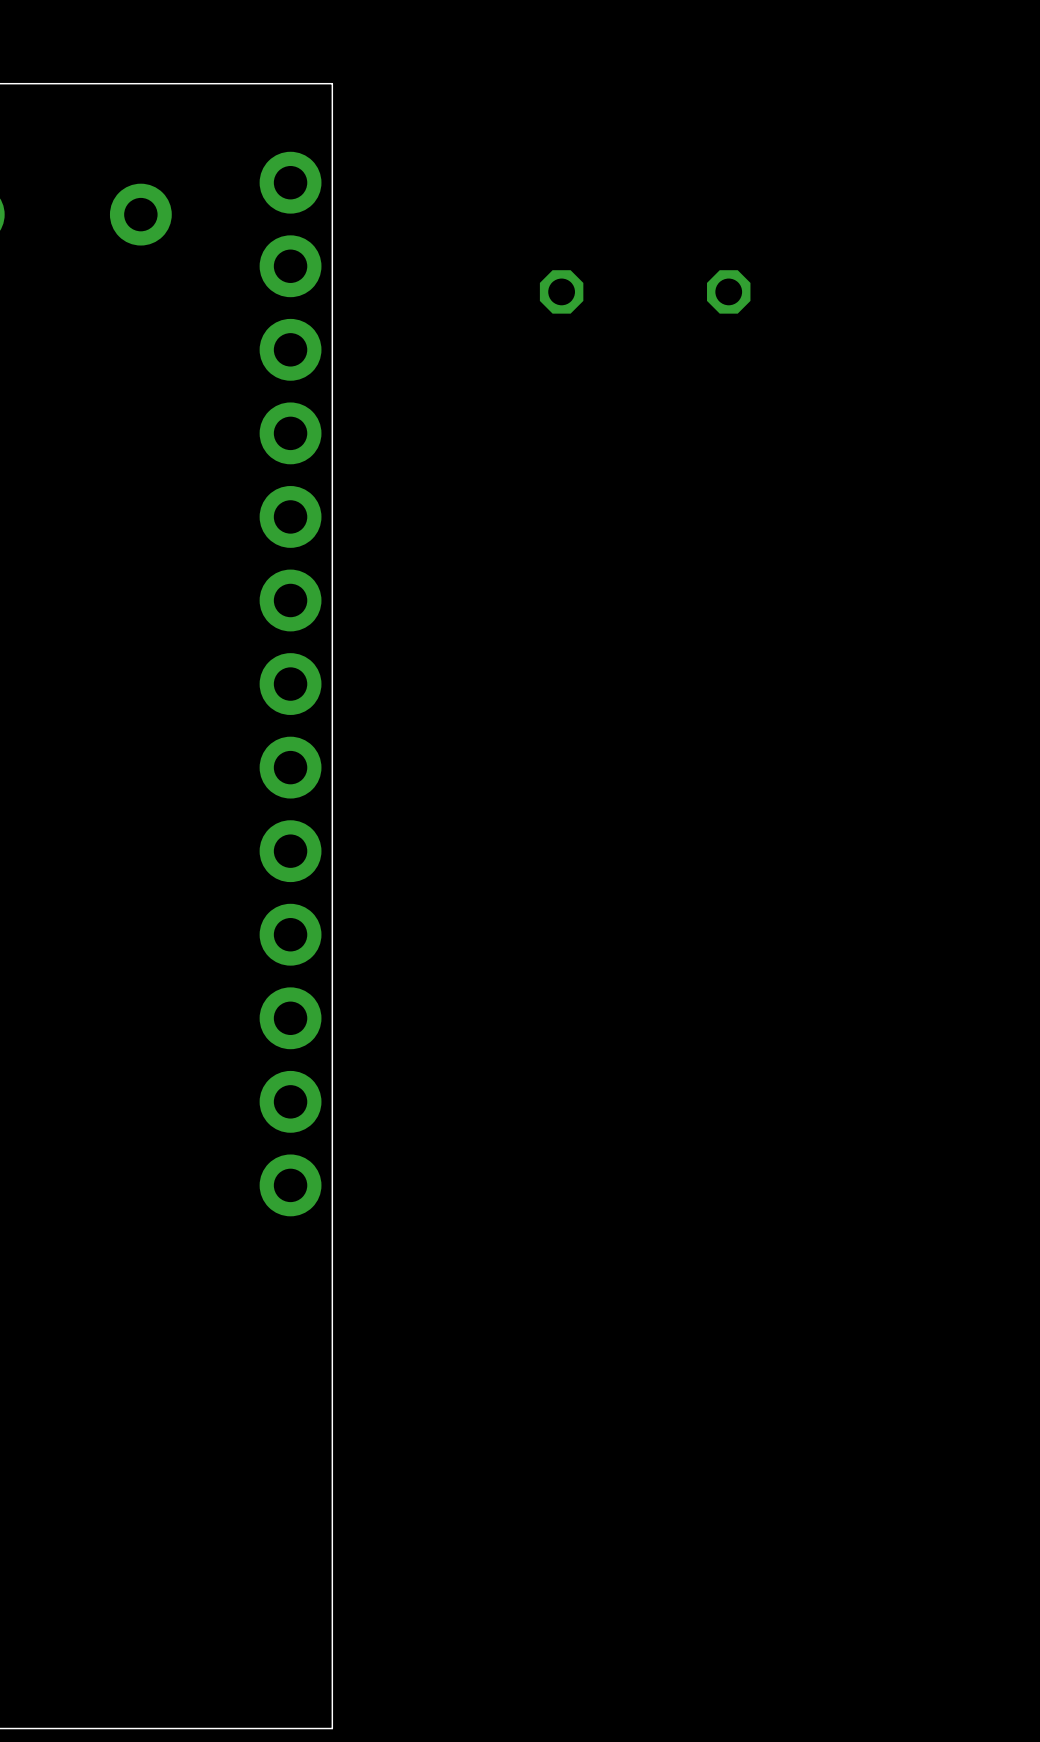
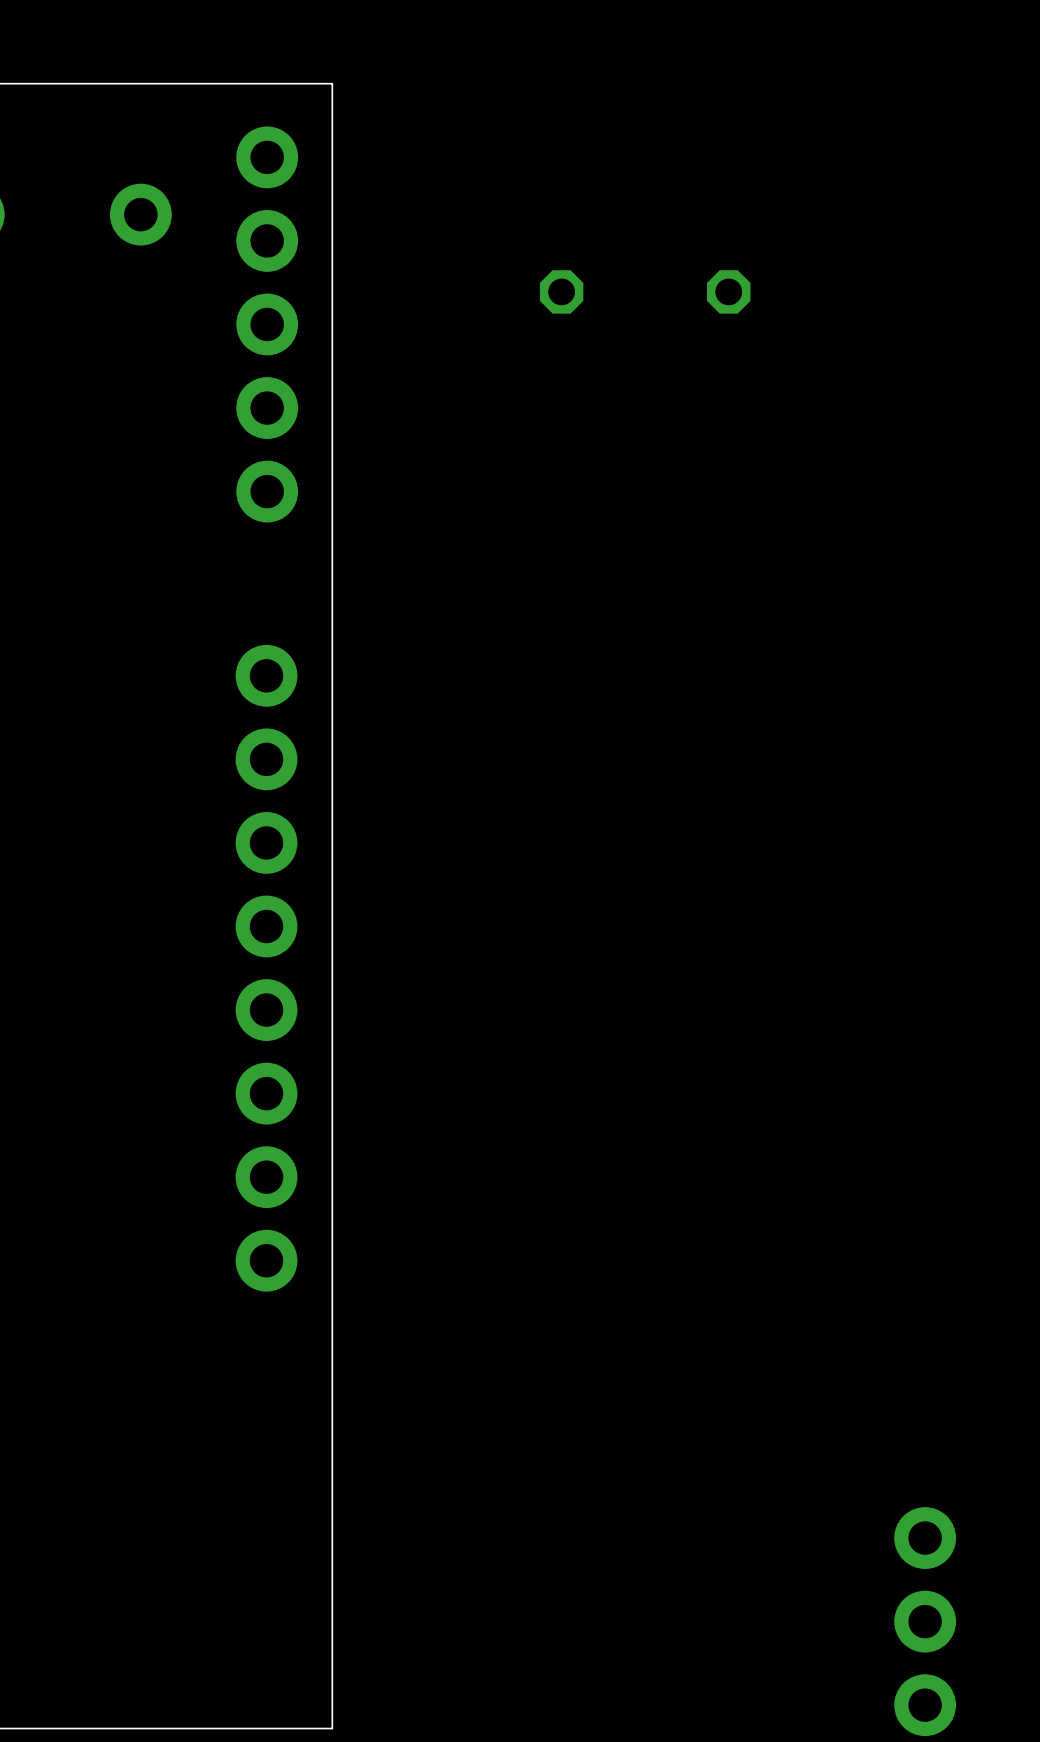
part position: (290, 349) -> (267, 324)
part position: (290, 892) -> (266, 968)
part: none -> (925, 1621)

